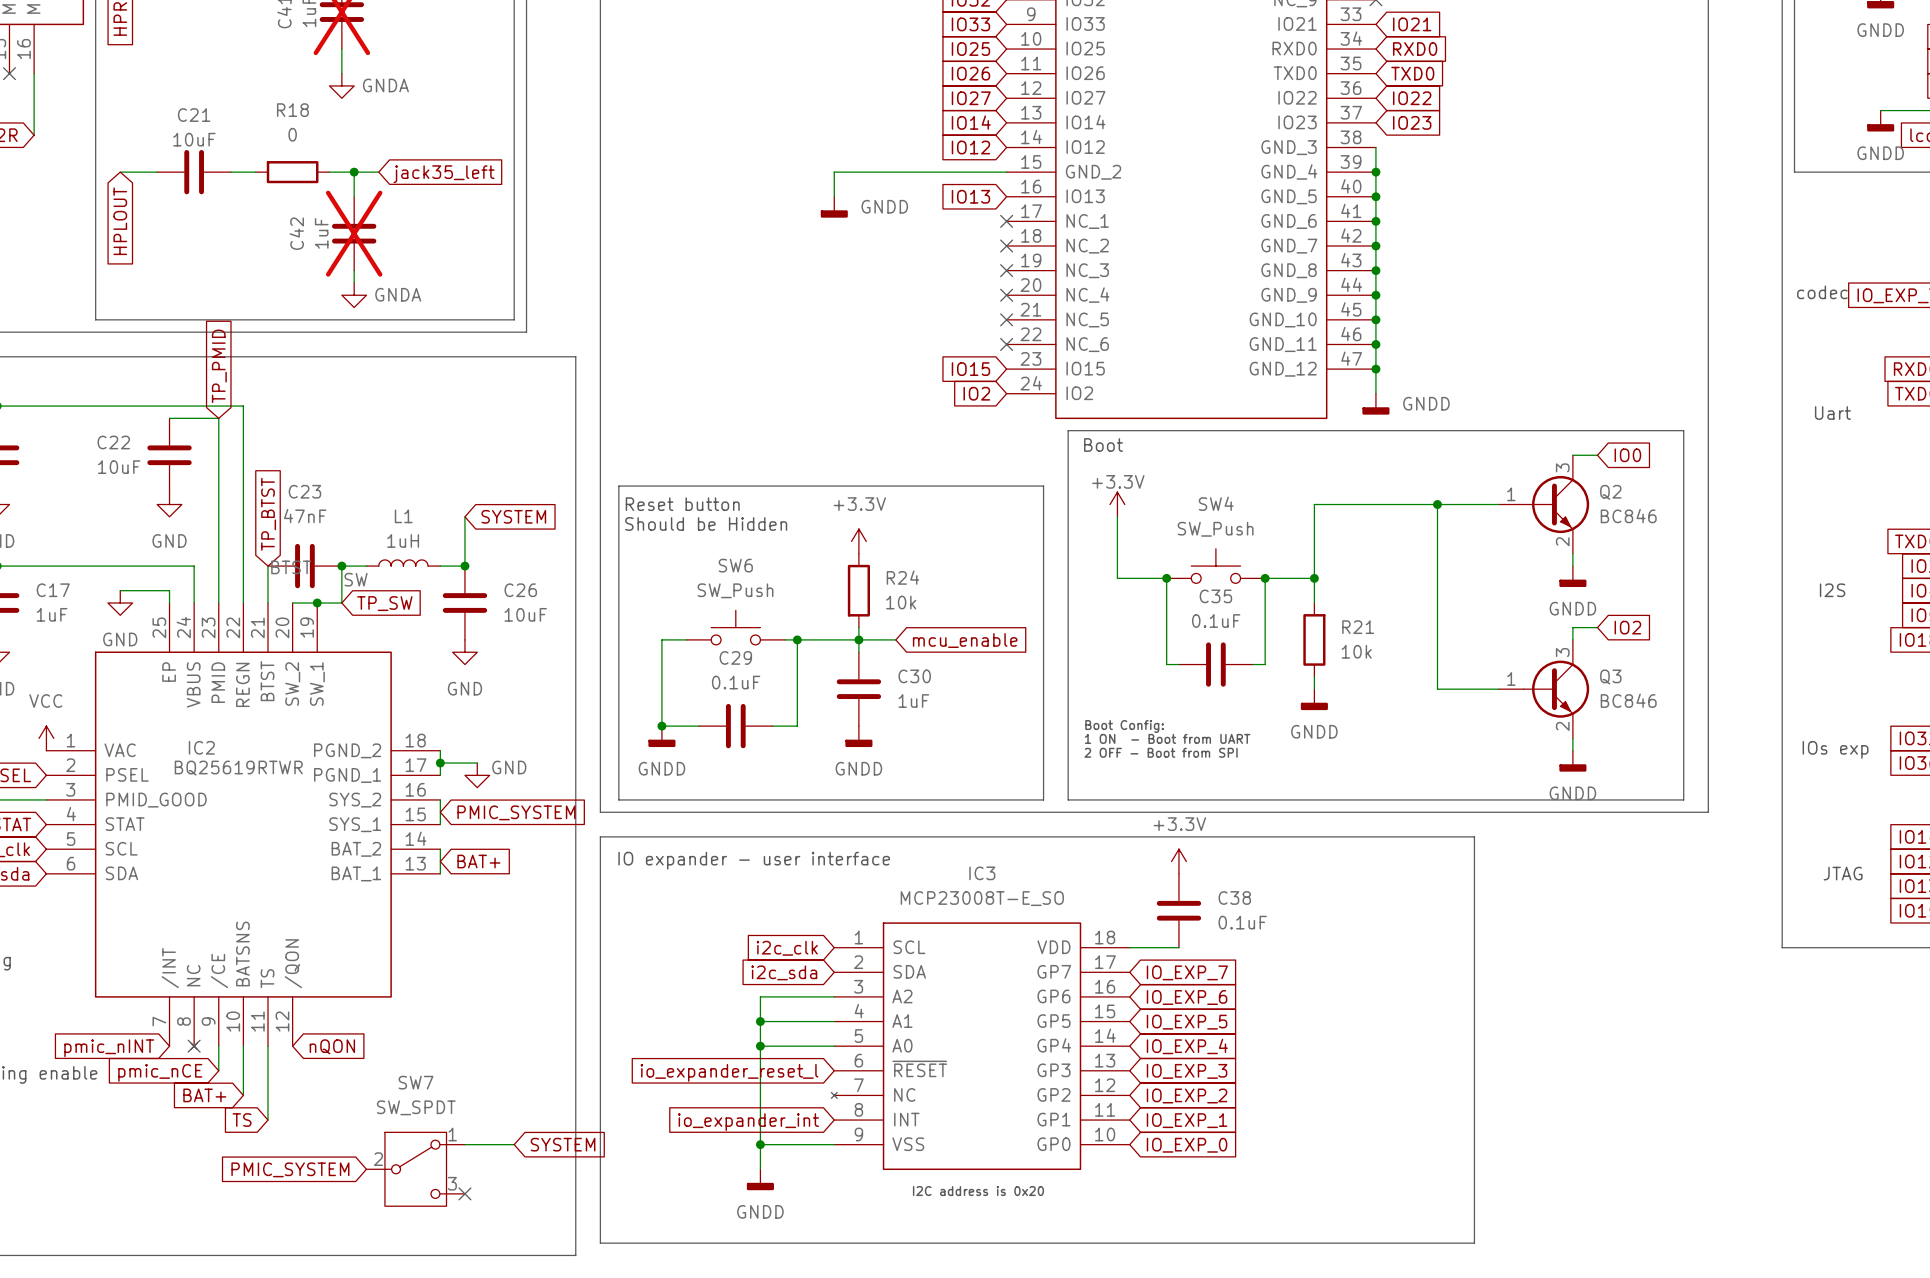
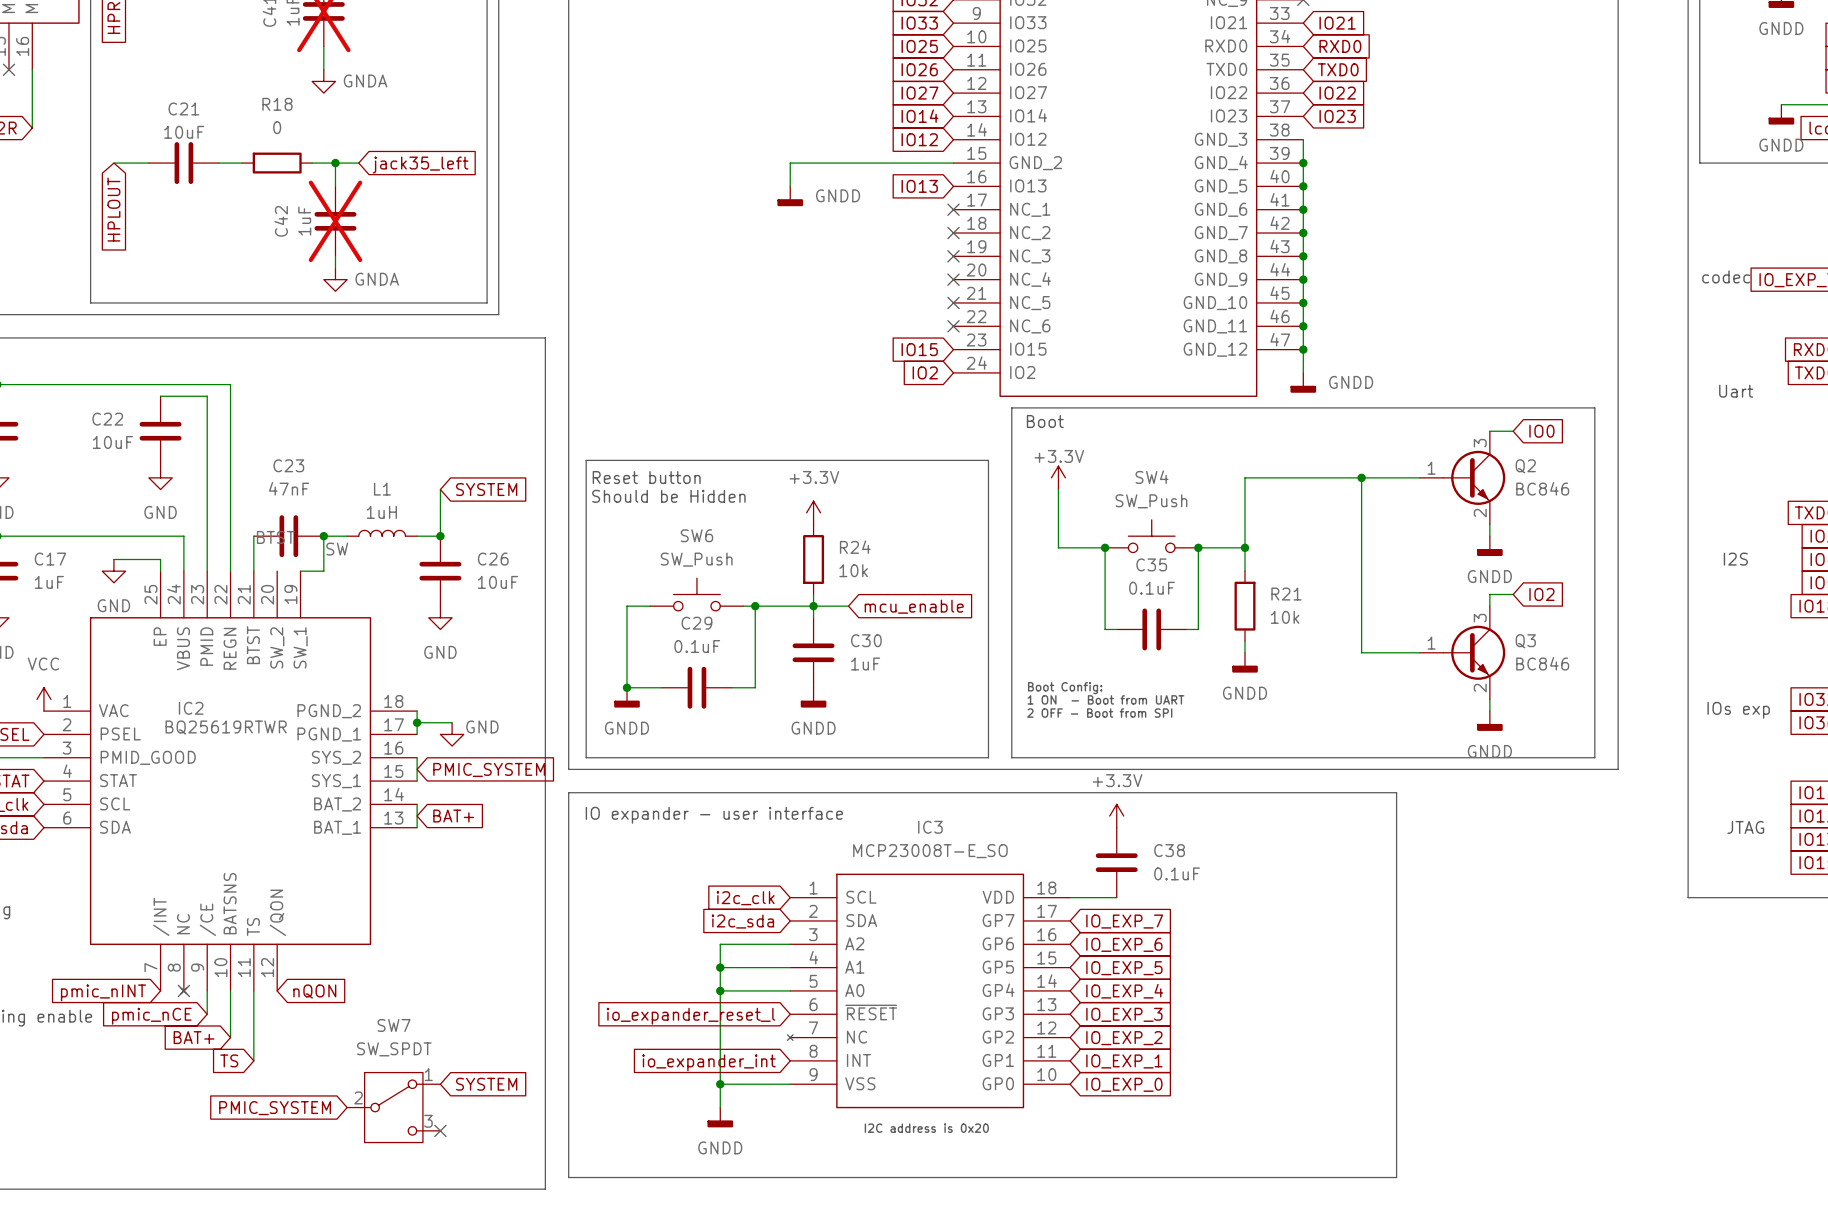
global label: TP_PMID (219, 366) -> none
global label: TP_BTST (268, 514) -> none
wire: (292, 603) (317, 603) -> none
junction: (317, 603) -> none
global label: TP_SW (384, 603) -> none
wire: (464, 1144) (514, 1144) -> none
global label position: SYSTEM (563, 1144) -> SYSTEM (486, 1084)

